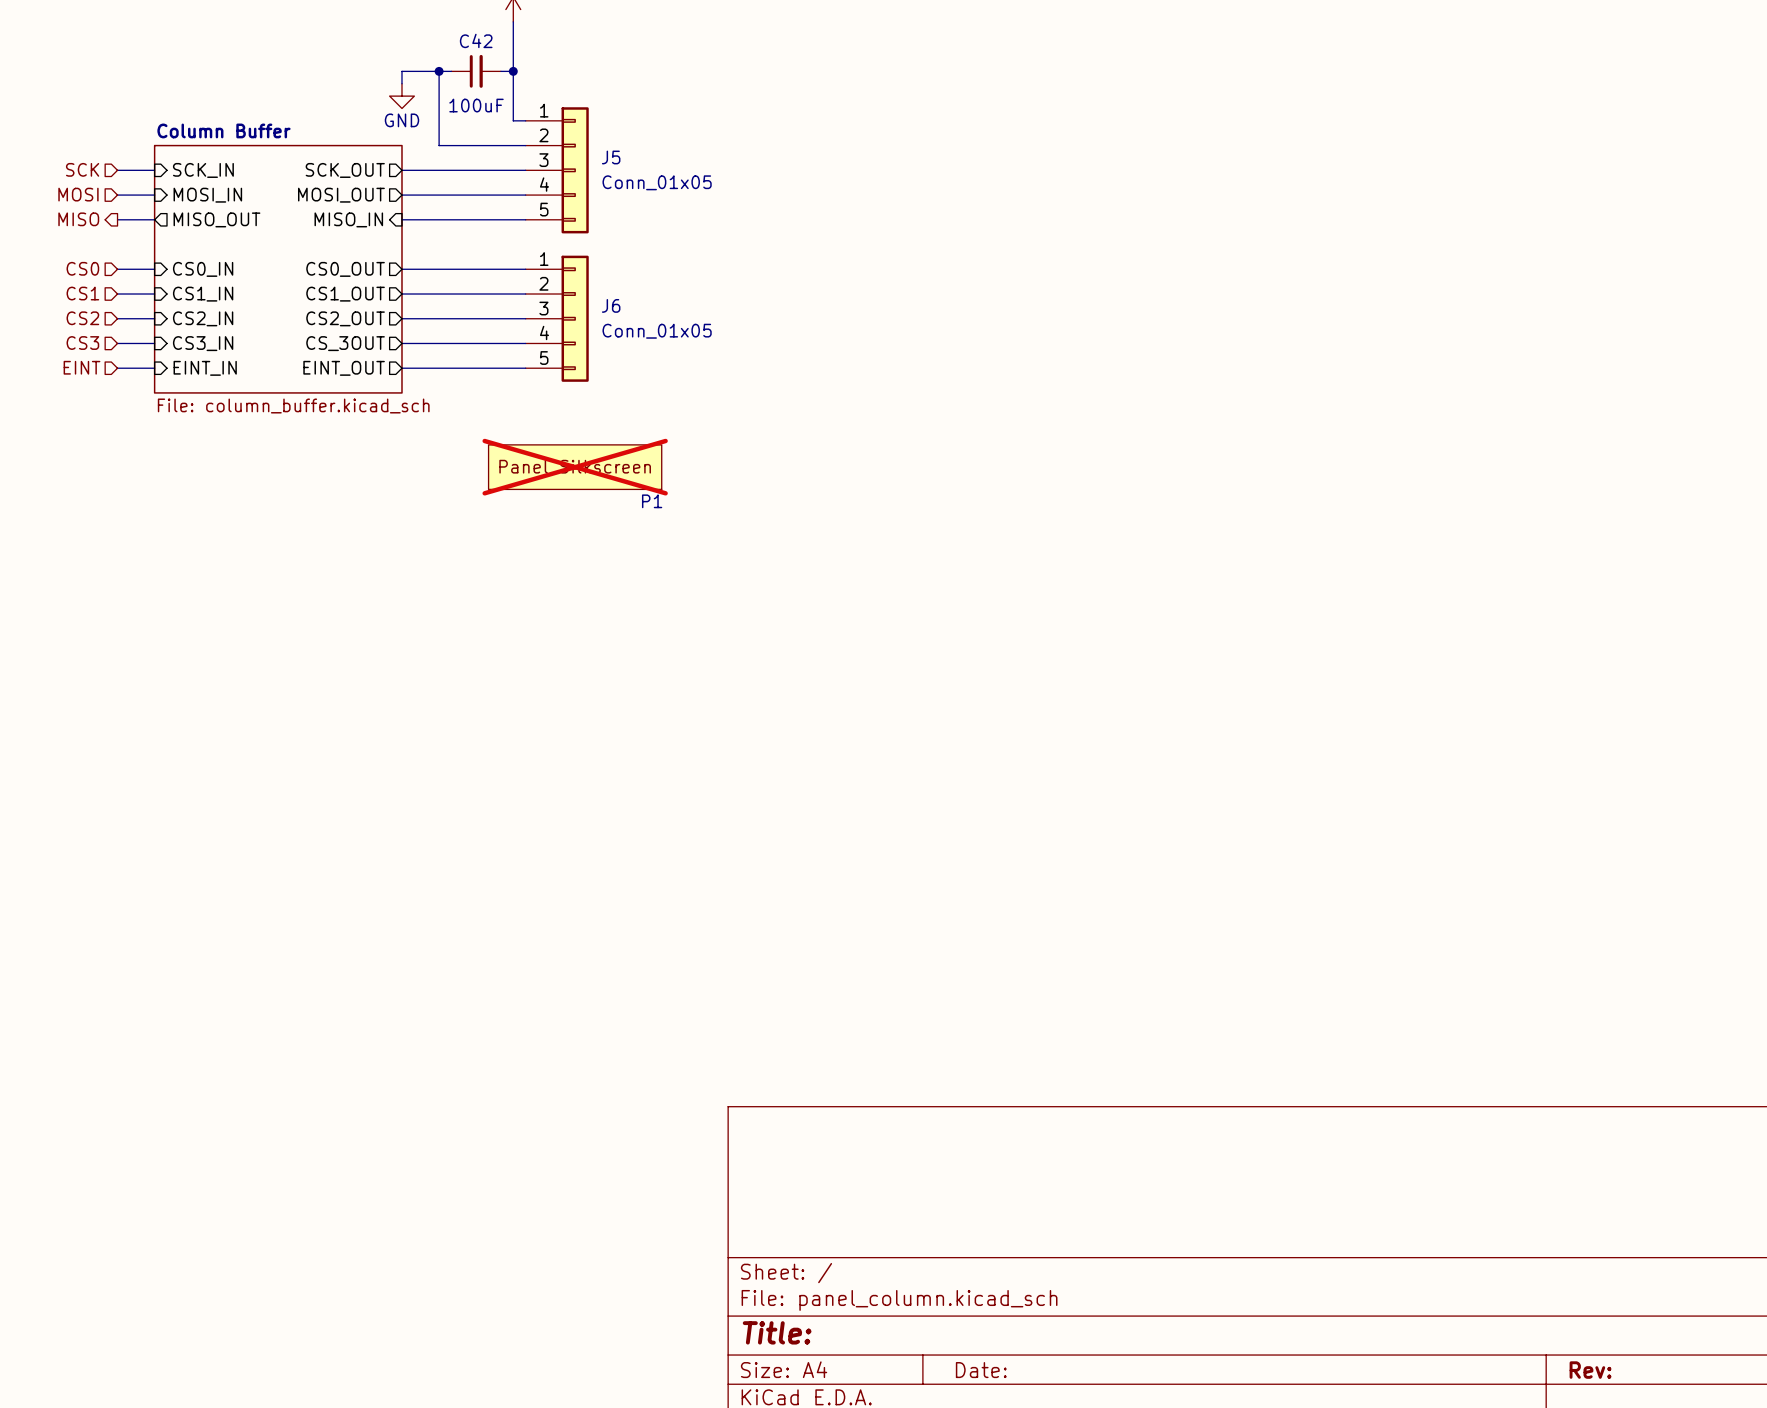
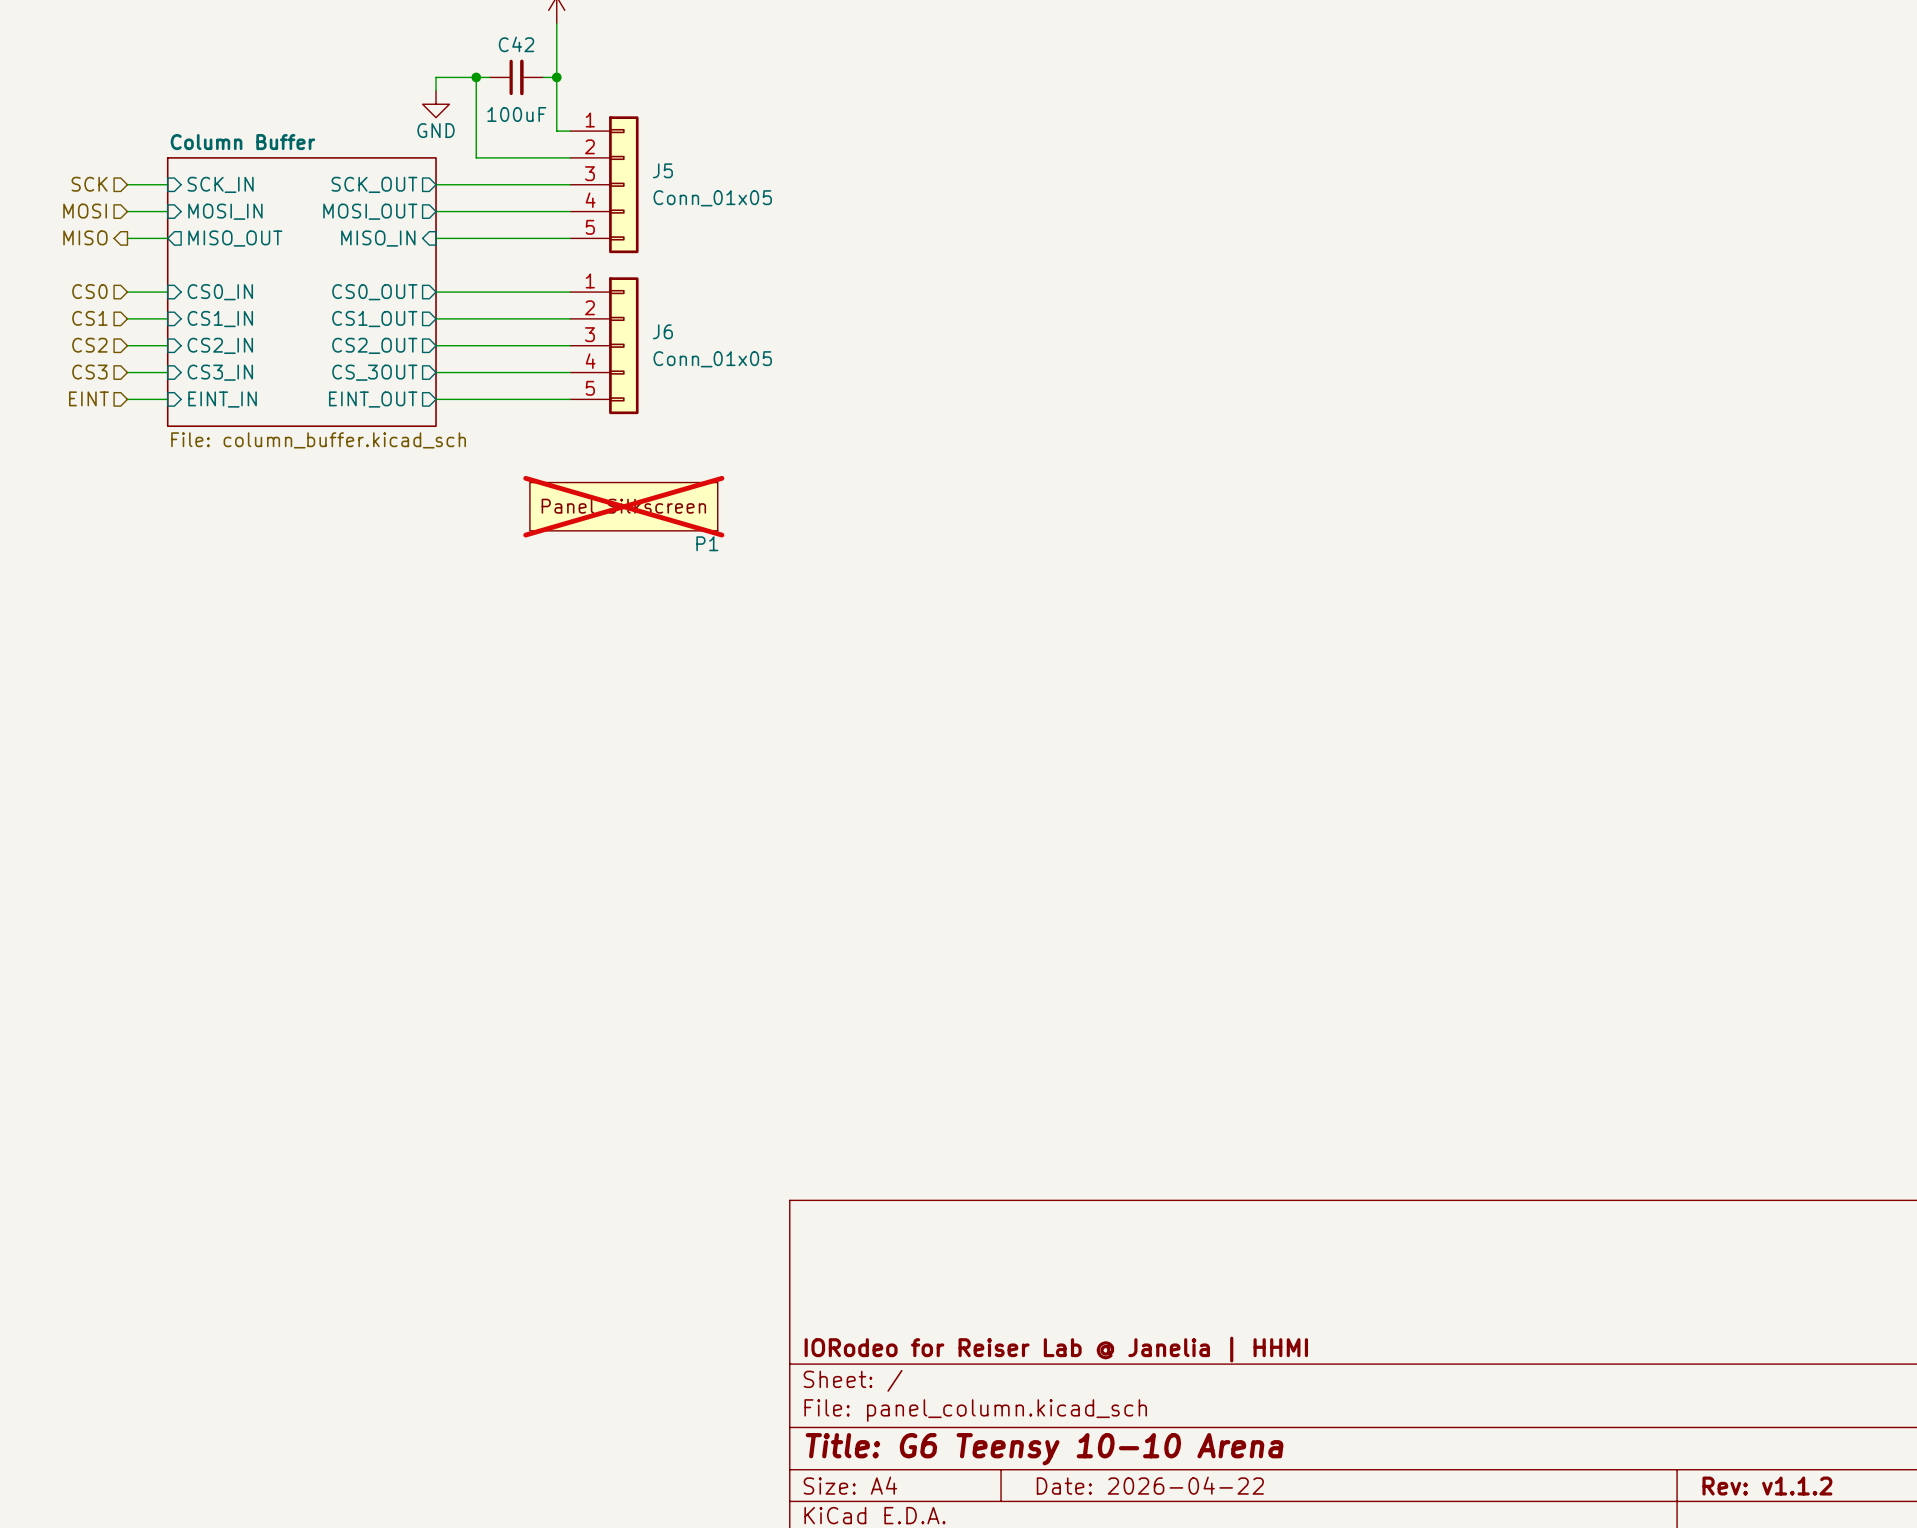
title block: none -> IORodeo for Reiser Lab @ Janelia | HHMI (1056, 1349)
title block: Title: (777, 1332) -> Title: G6 Teensy 10-10 Arena (1044, 1449)
title block: Date: (981, 1370) -> Date: 2026-04-22 (1150, 1485)
title block: Rev: (1590, 1370) -> Rev: v1.1.2 (1767, 1486)

